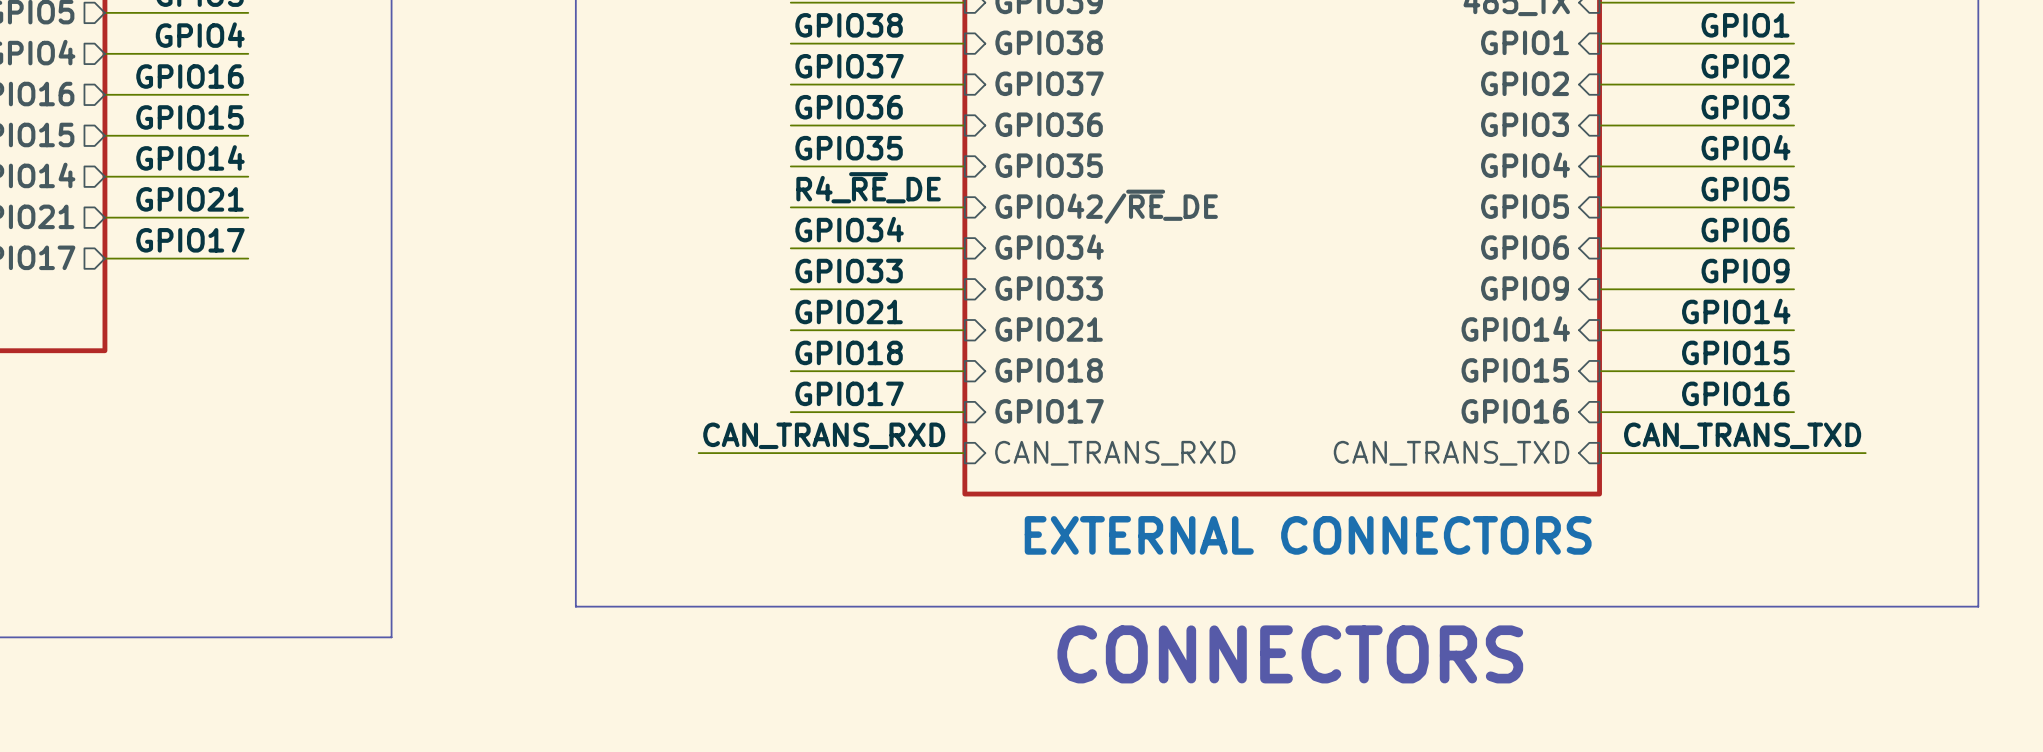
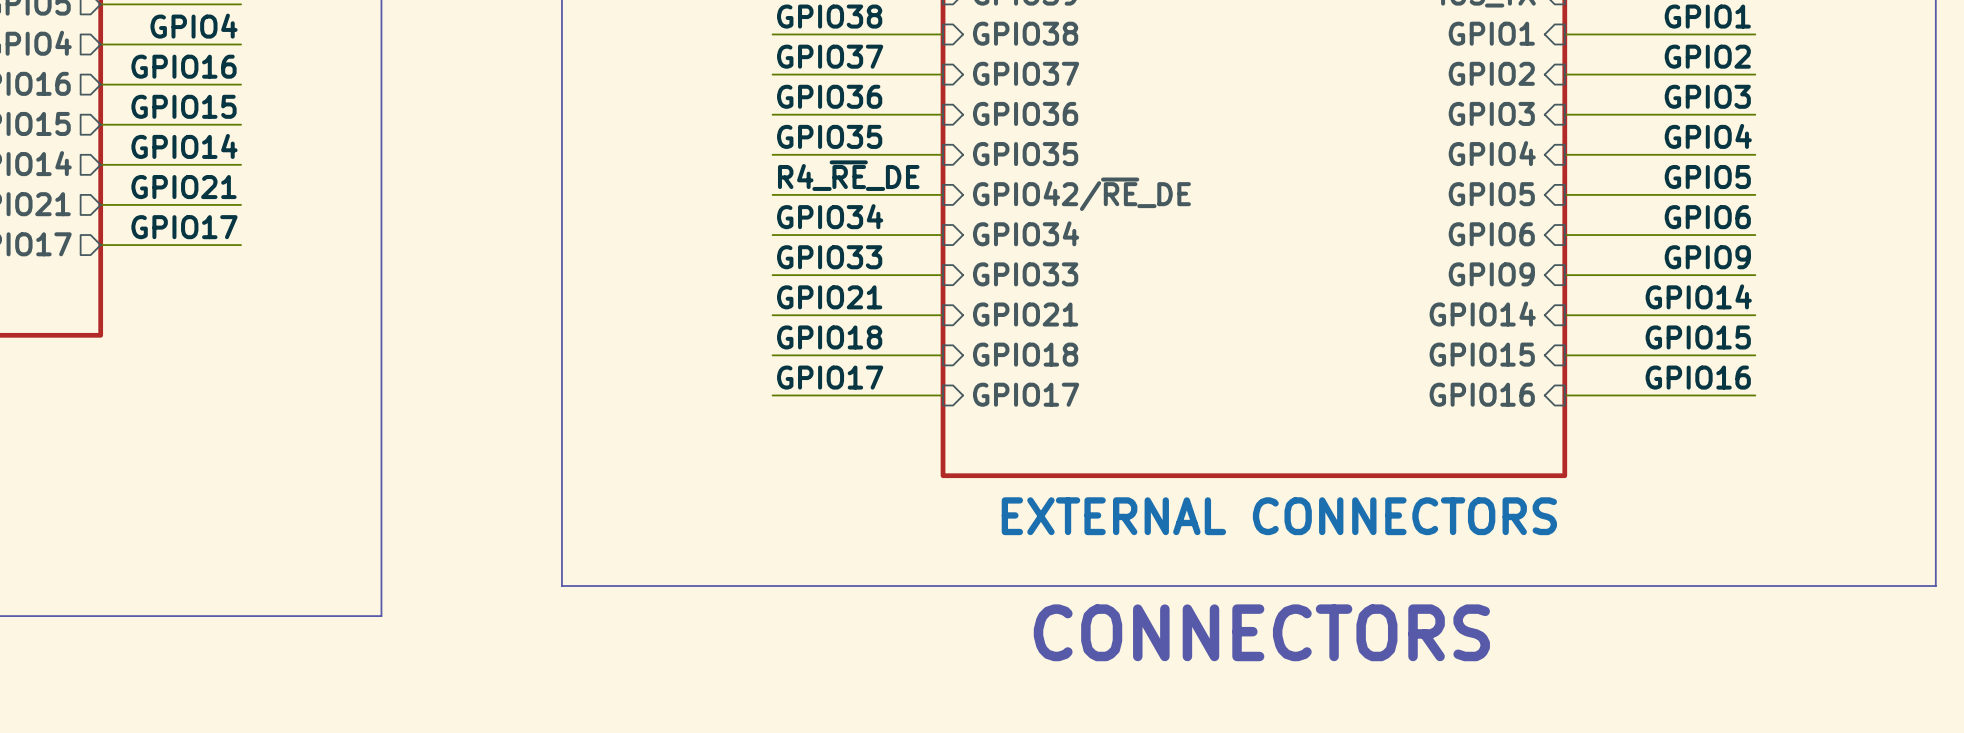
label: CAN_TRANS_RXD (824, 435) -> none
label: CAN_TRANS_TXD (1742, 435) -> none
wire: (698, 453) (964, 453) -> none
sheet pin: CAN_TRANS_RXD (1115, 453) -> none
sheet pin: CAN_TRANS_TXD (1451, 453) -> none
wire: (1599, 453) (1865, 453) -> none

